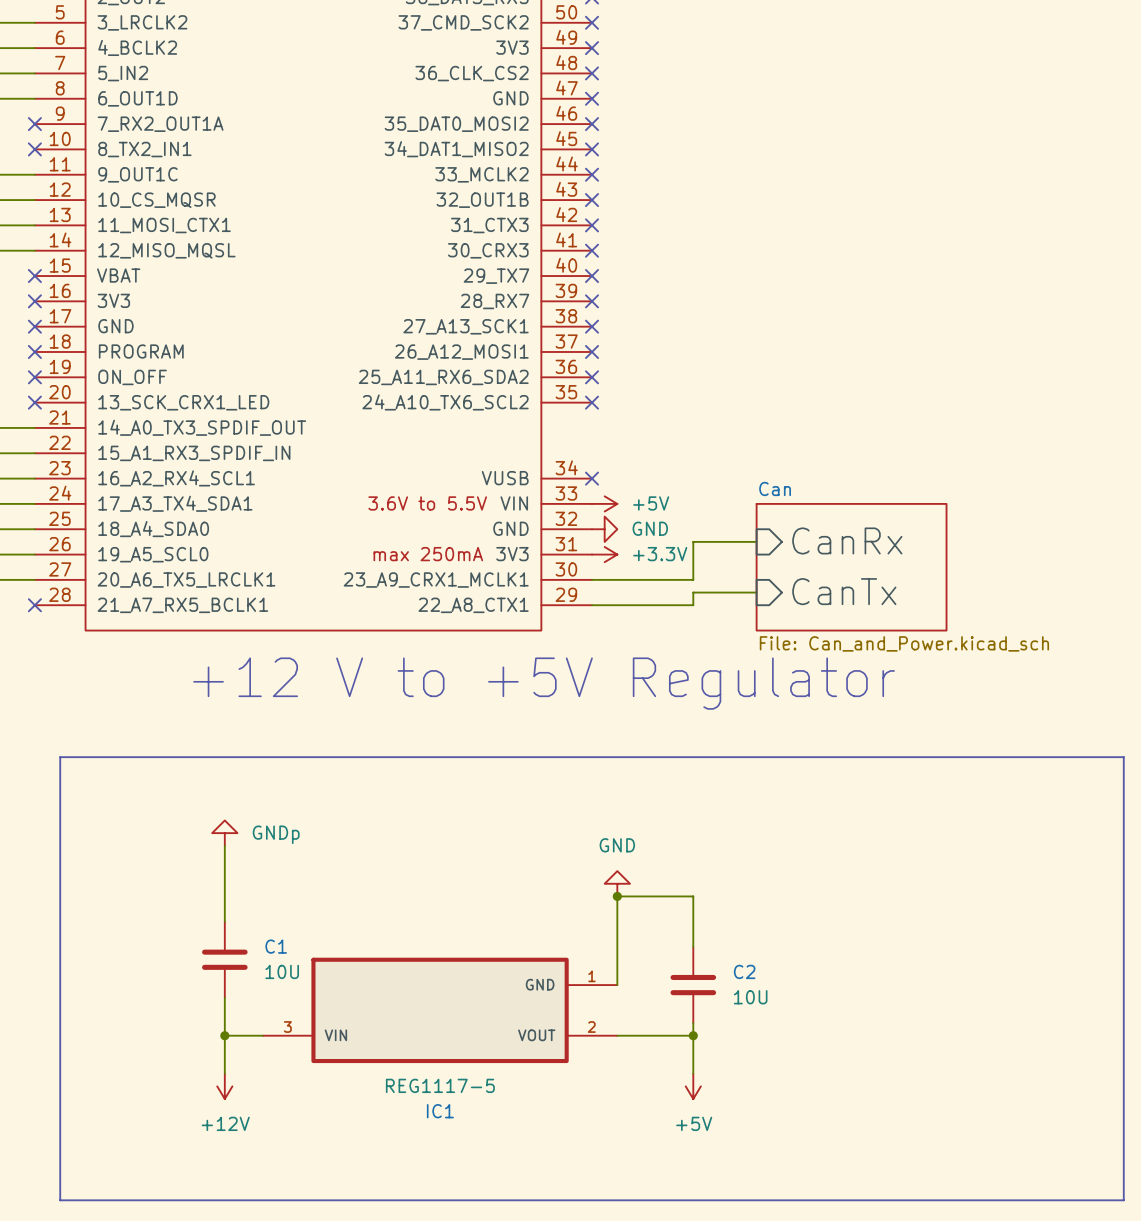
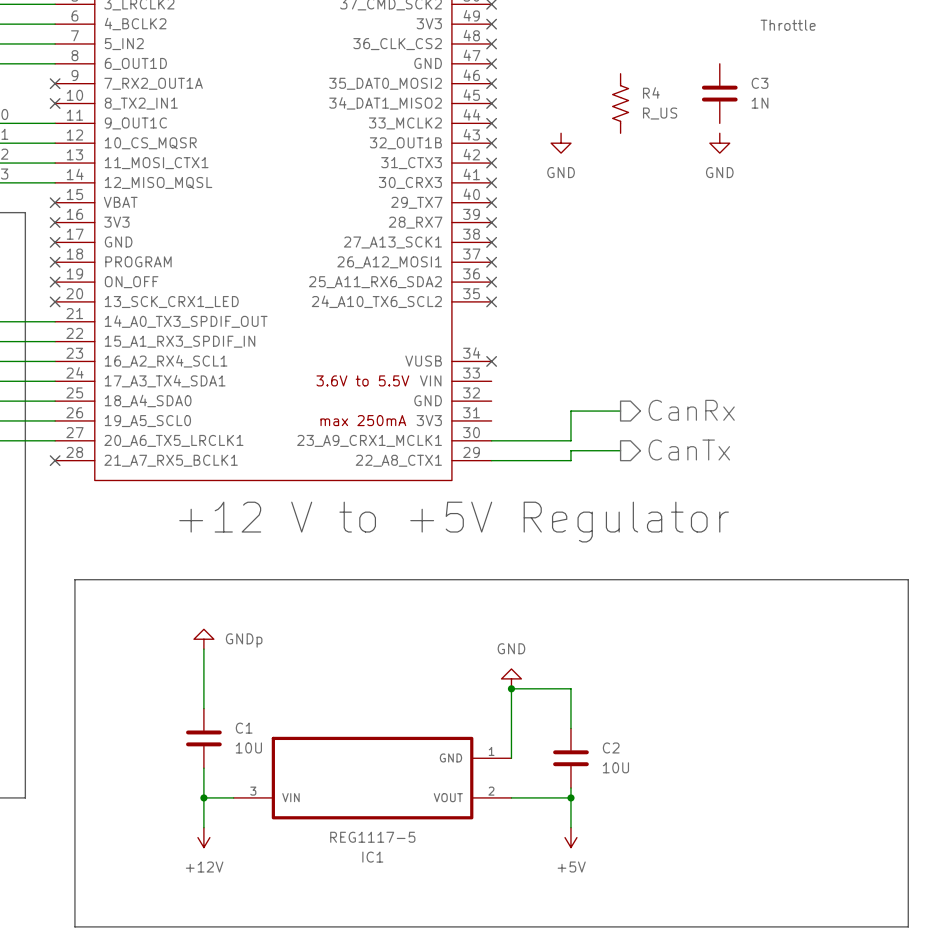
label: none -> Throttle (788, 25)
C3: none -> 1N (719, 93)
R4: none -> R_US (620, 103)
power symbol: none -> GND (561, 143)
power symbol: none -> GND (719, 143)
power symbol: +5V (604, 503) -> none
power symbol: GND (604, 529) -> none
power symbol: +3.3V (604, 554) -> none
sheet Can: File: Can_and_Power.kicad_sch (851, 567) -> none

